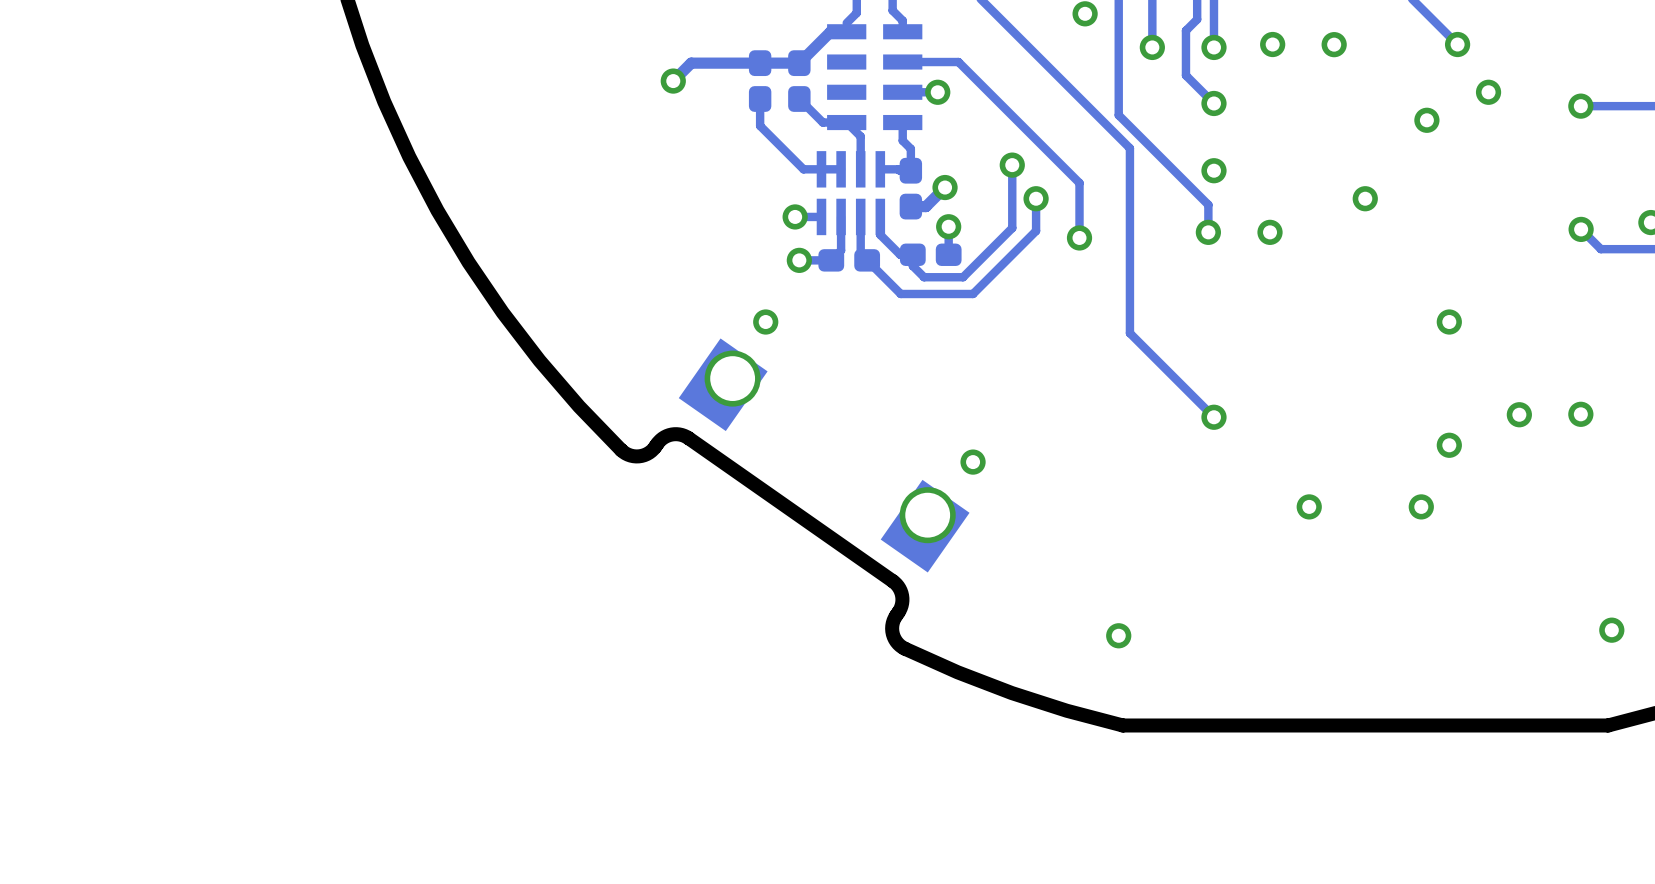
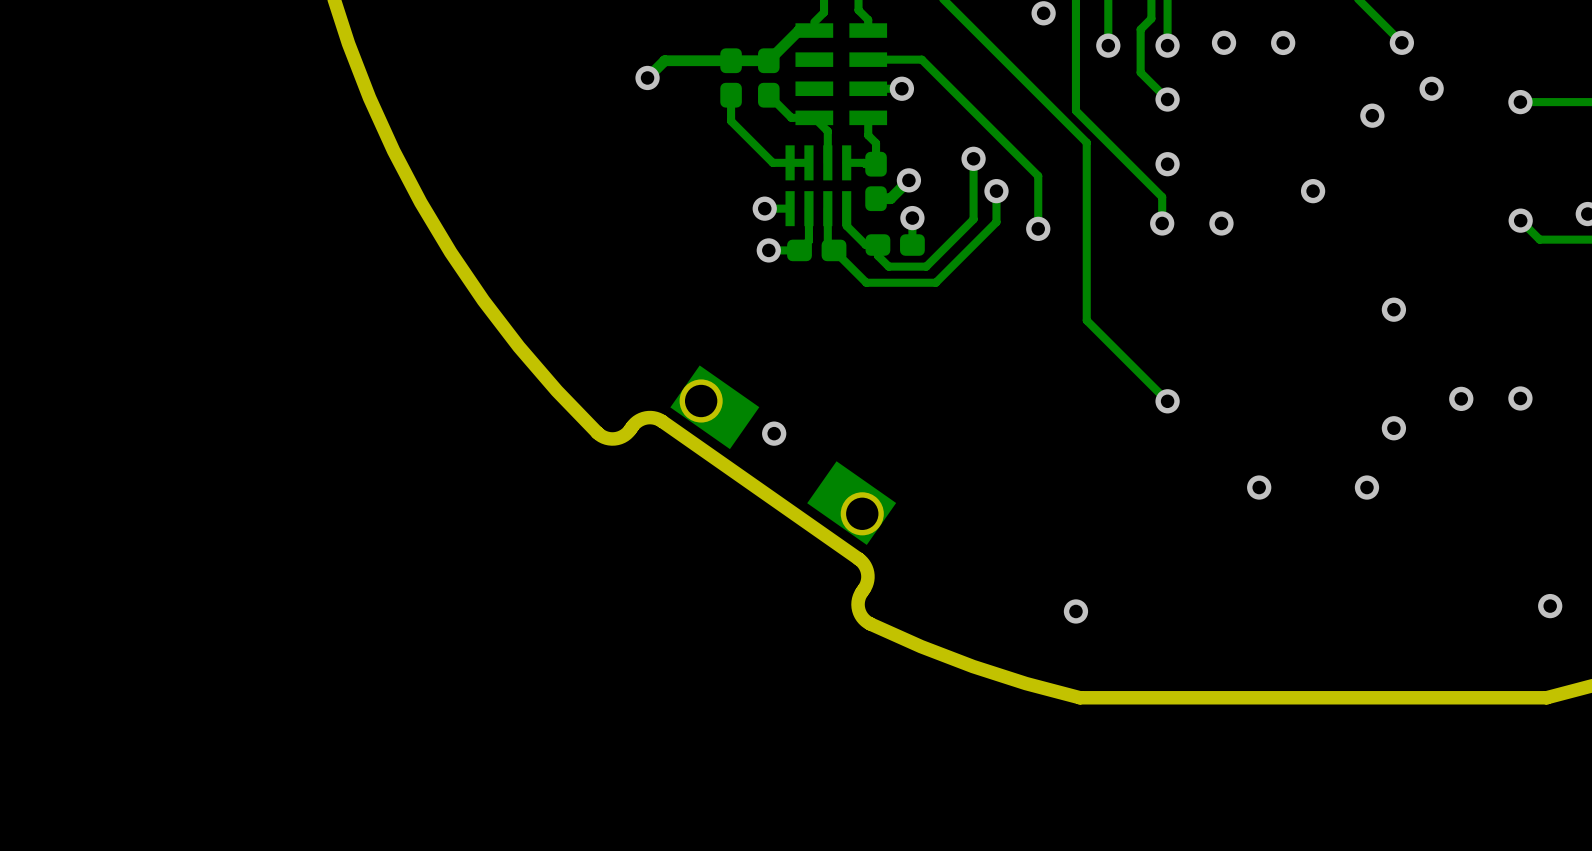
via: (765, 322) -> none
part footprint: [678, 338, 970, 573] -> [670, 365, 897, 545]
via: none -> (774, 433)
via: (973, 462) -> none

